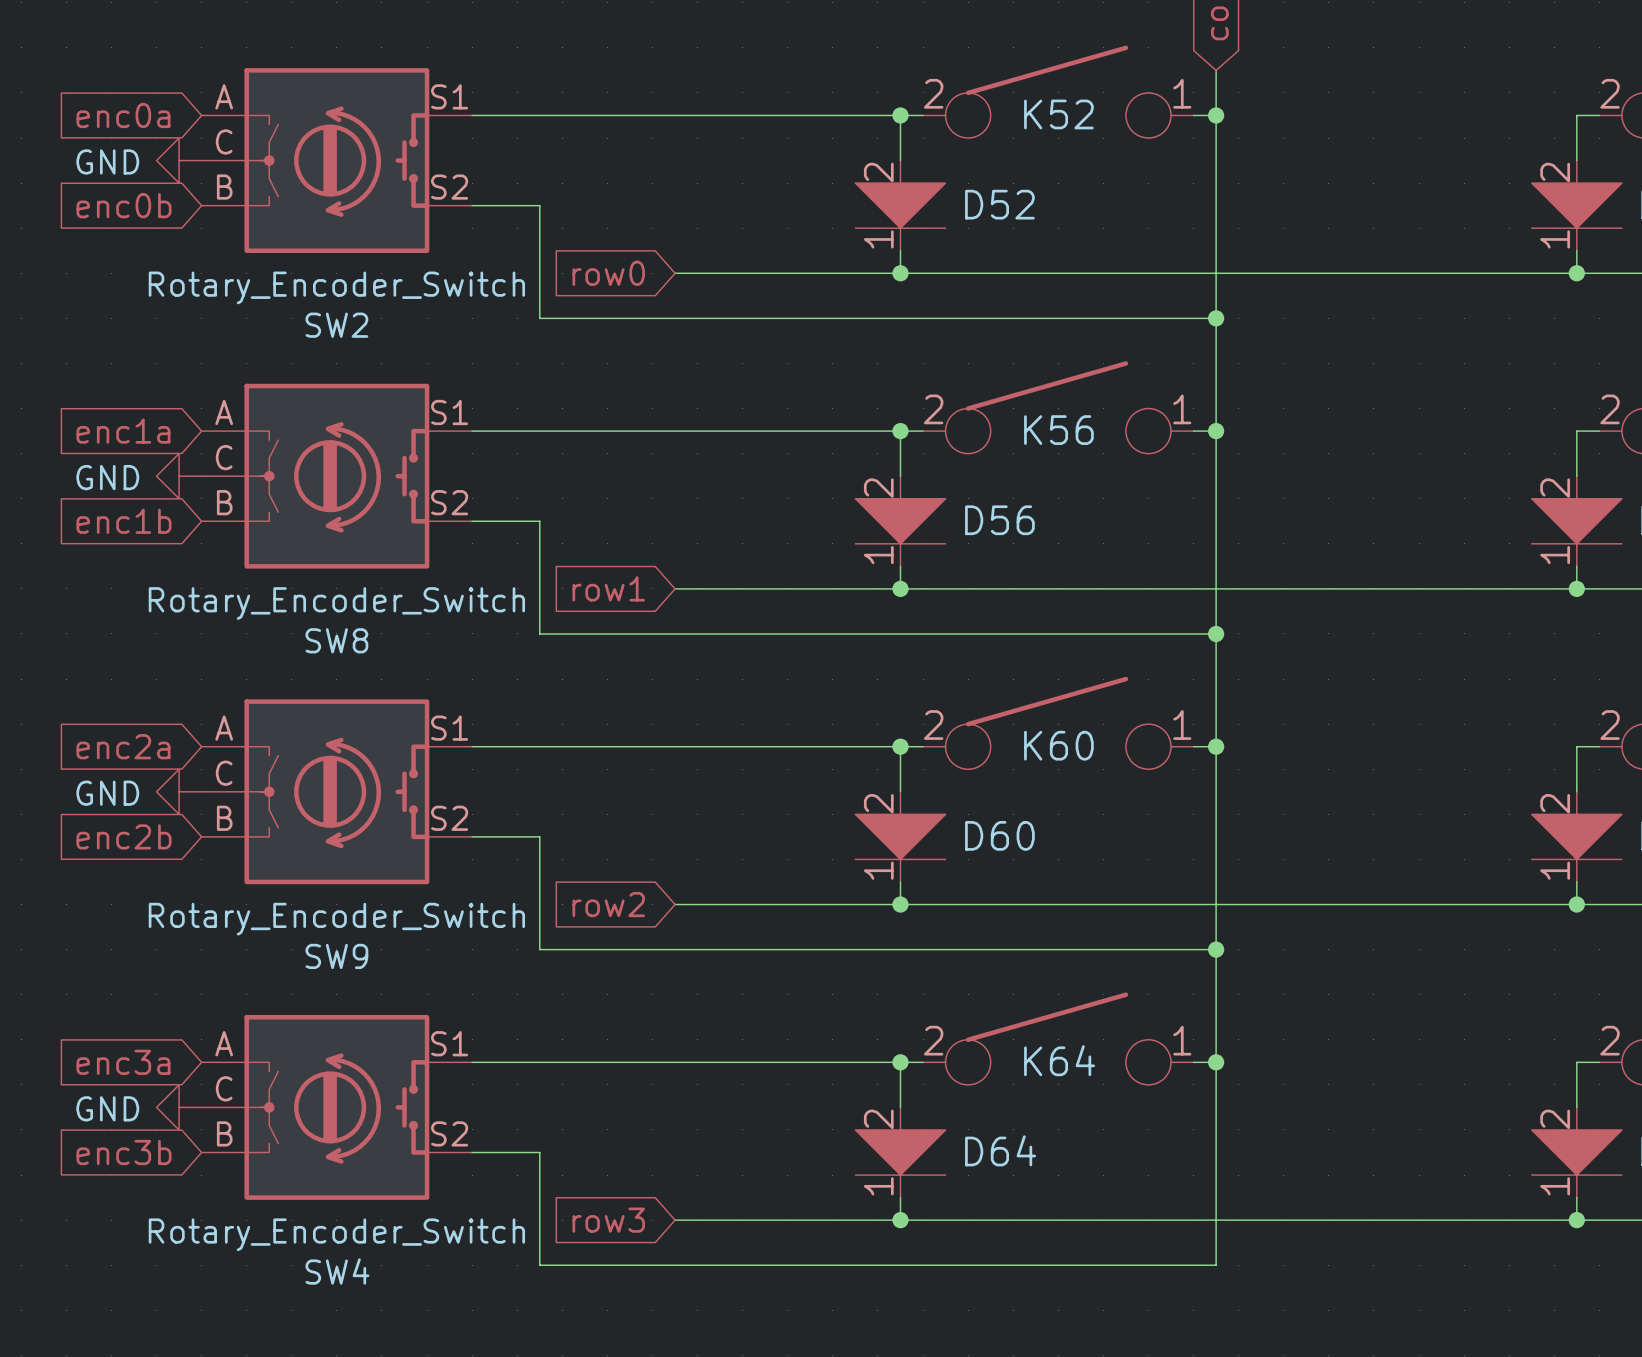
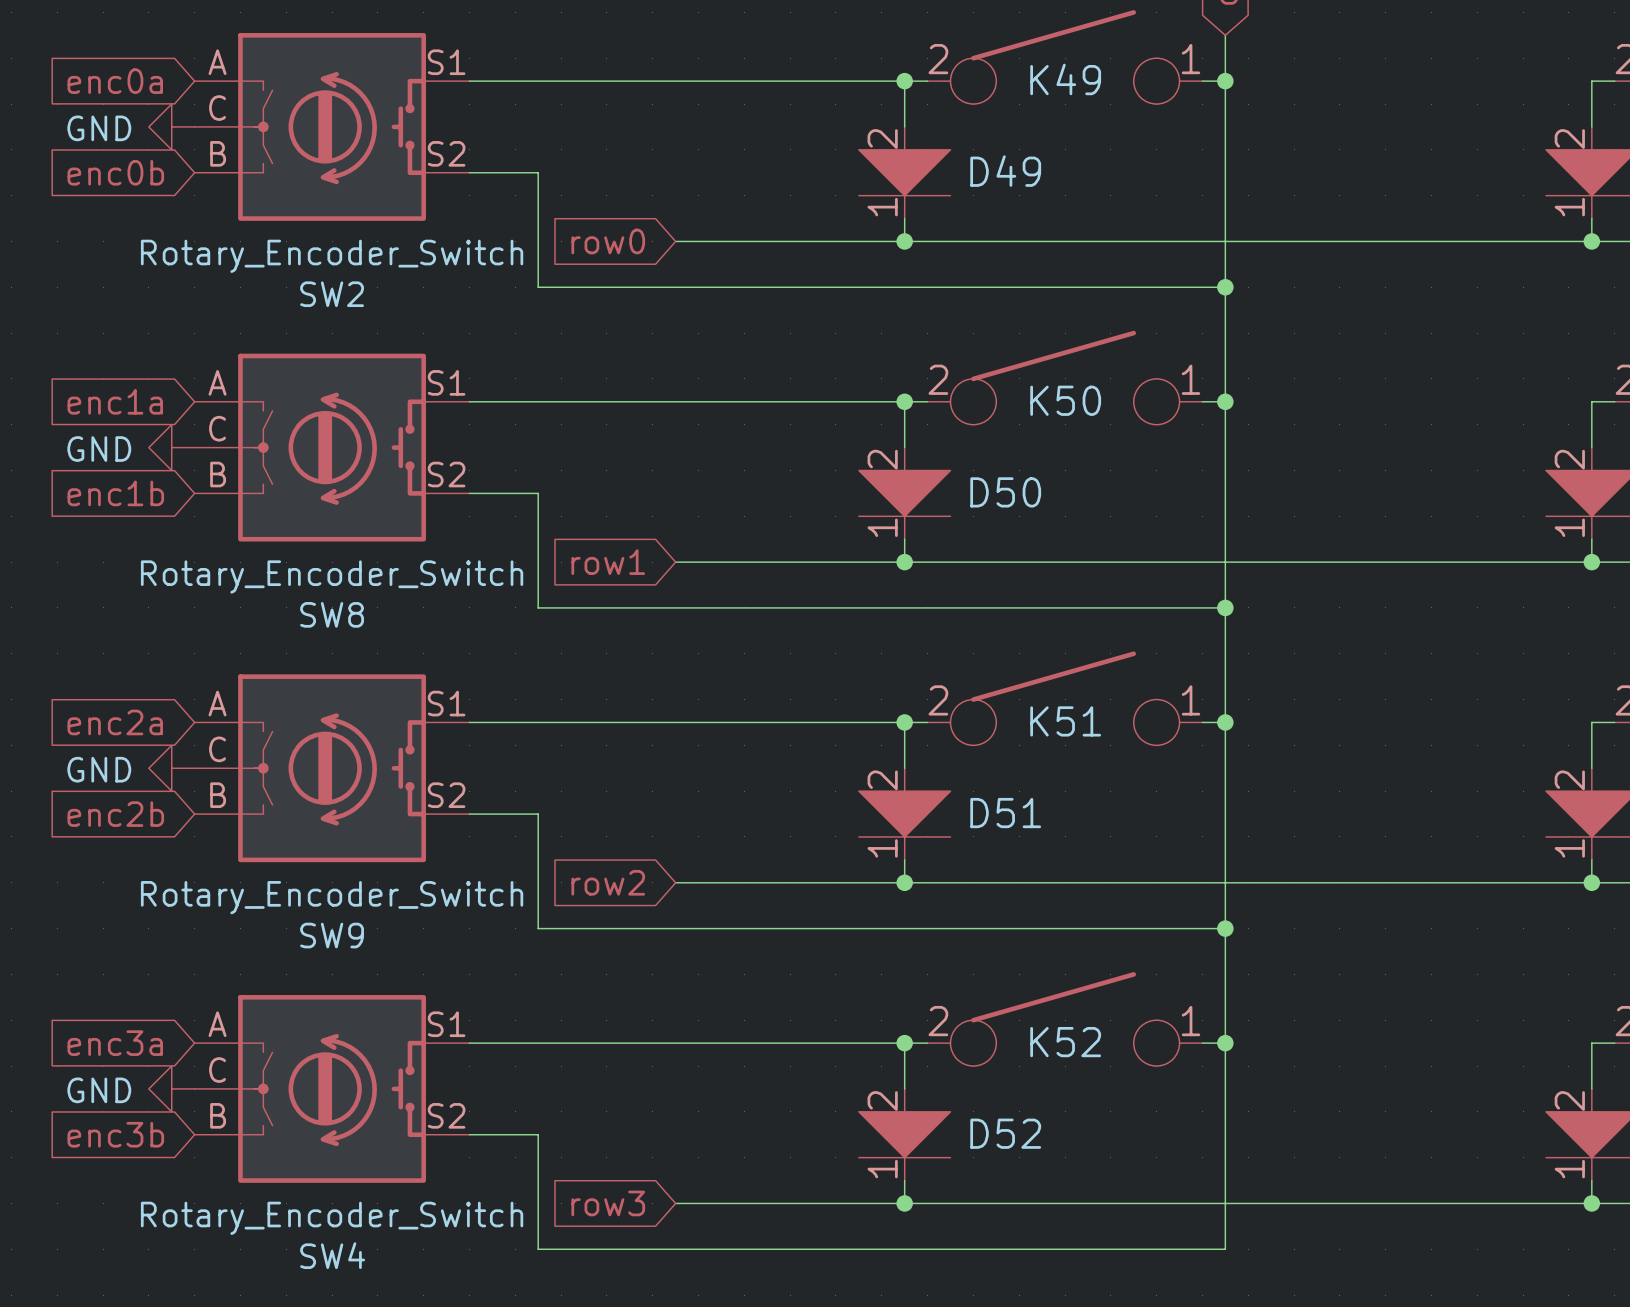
K52 name: K52 (1058, 114) -> K49 (1065, 79)
D52 name: D52 (999, 204) -> D49 (1005, 171)
K56 name: K56 (1058, 430) -> K50 (1065, 400)
D56 name: D56 (999, 520) -> D50 (1005, 492)
K60 name: K60 (1058, 745) -> K51 (1065, 721)
D60 name: D60 (999, 835) -> D51 (1005, 813)
K64 name: K64 (1059, 1060) -> K52 (1065, 1042)
D64 name: D64 (1000, 1150) -> D52 (1005, 1133)

